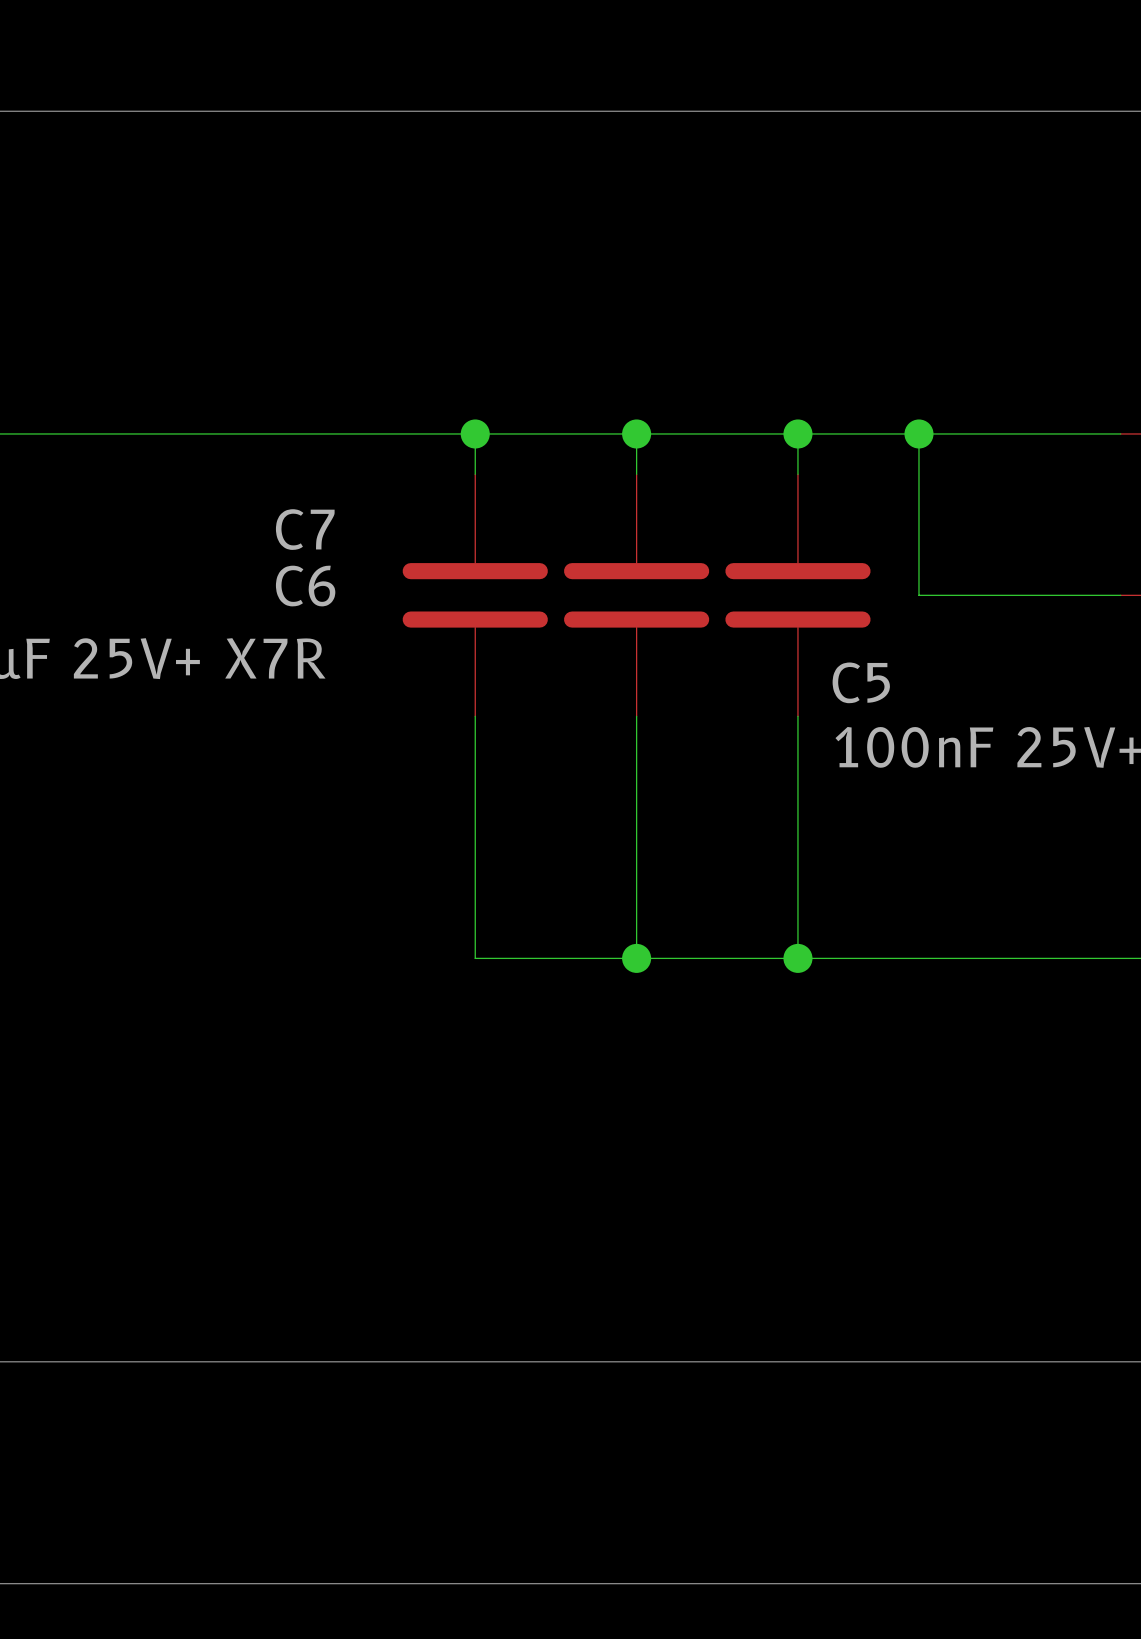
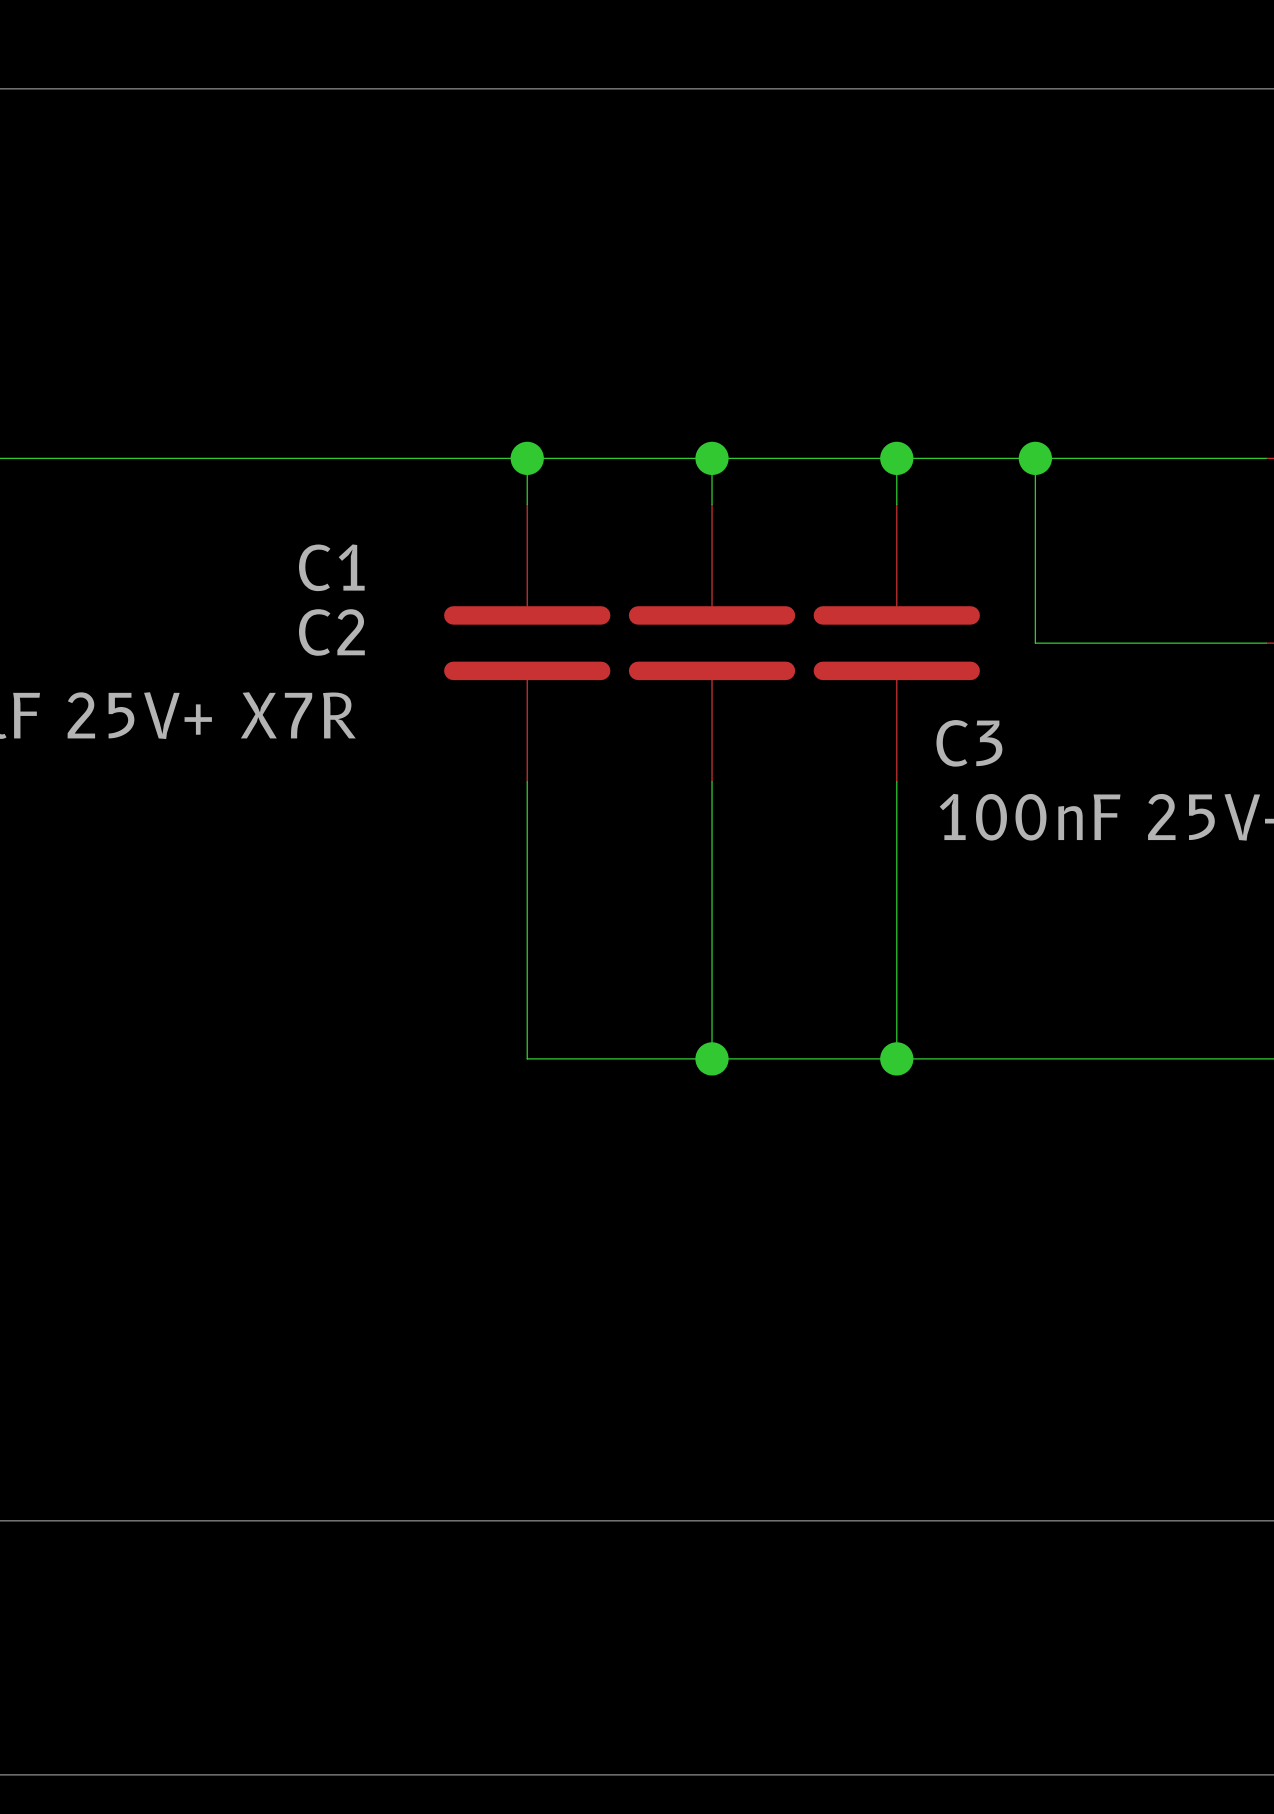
C7 name: C7 (305, 529) -> C1 (331, 567)
C6 name: C6 (305, 586) -> C2 (331, 632)
C5 name: C5 (861, 682) -> C3 (969, 743)

